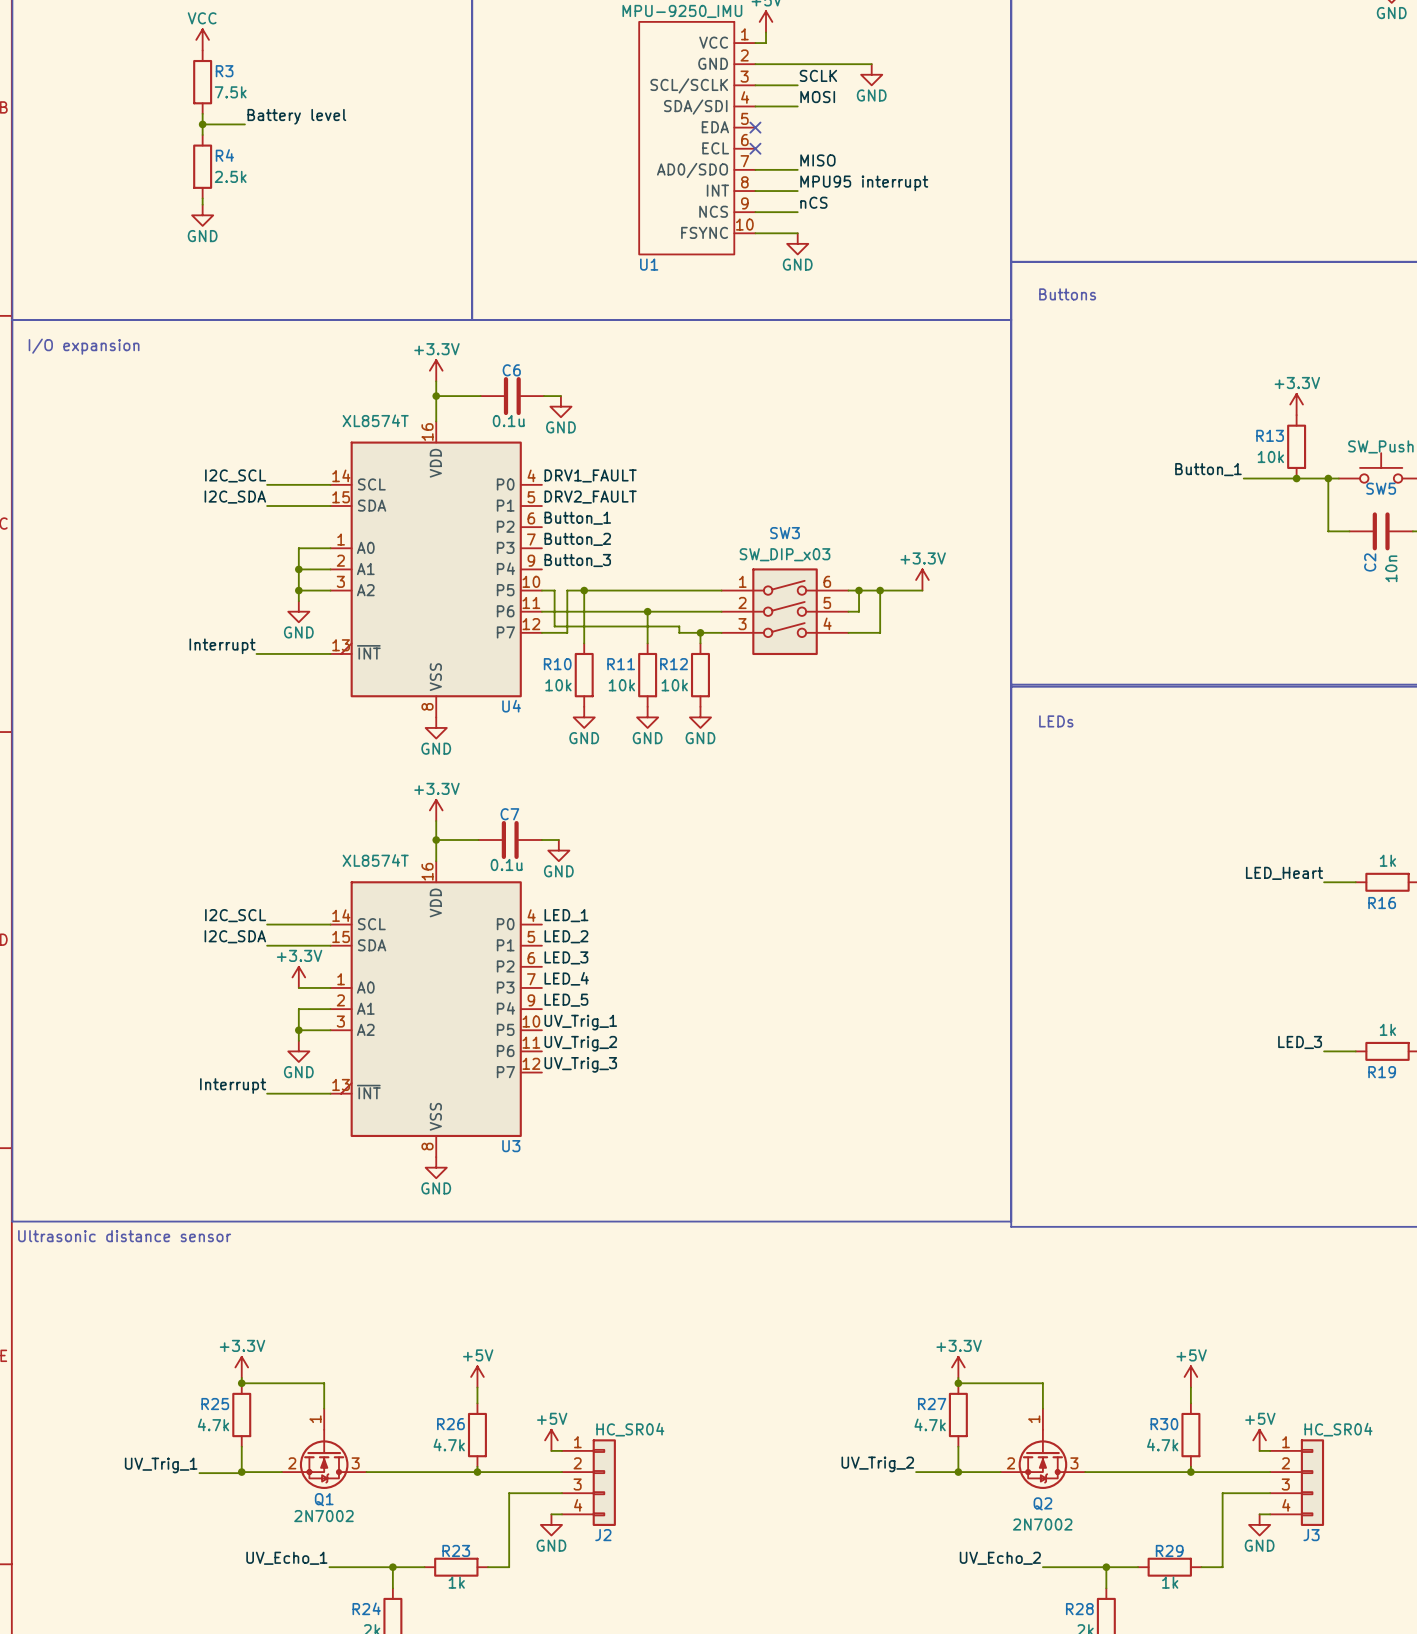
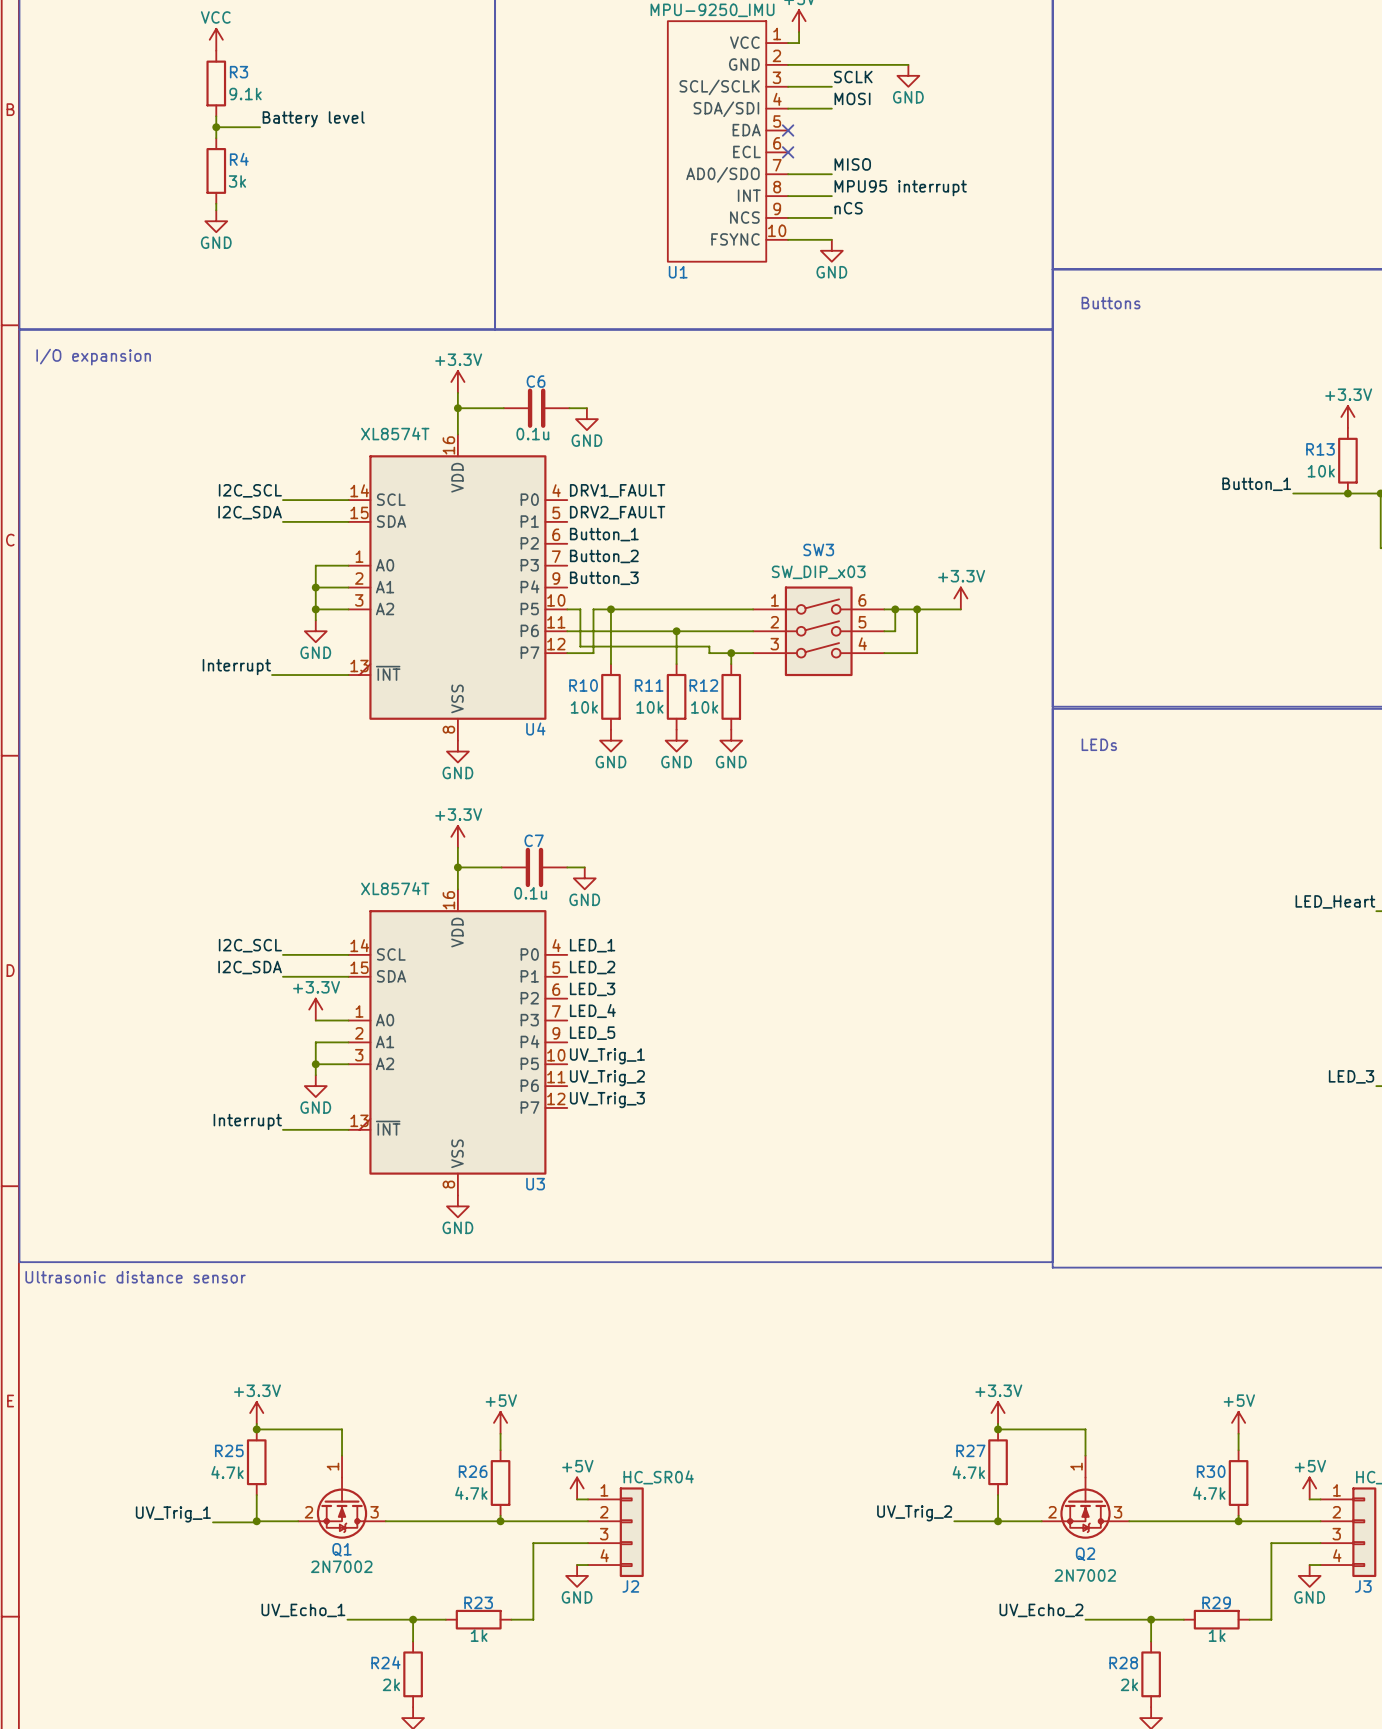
R3 value: 7.5k (230, 92) -> 9.1k (245, 94)
R4 value: 2.5k (230, 176) -> 3k (237, 181)

